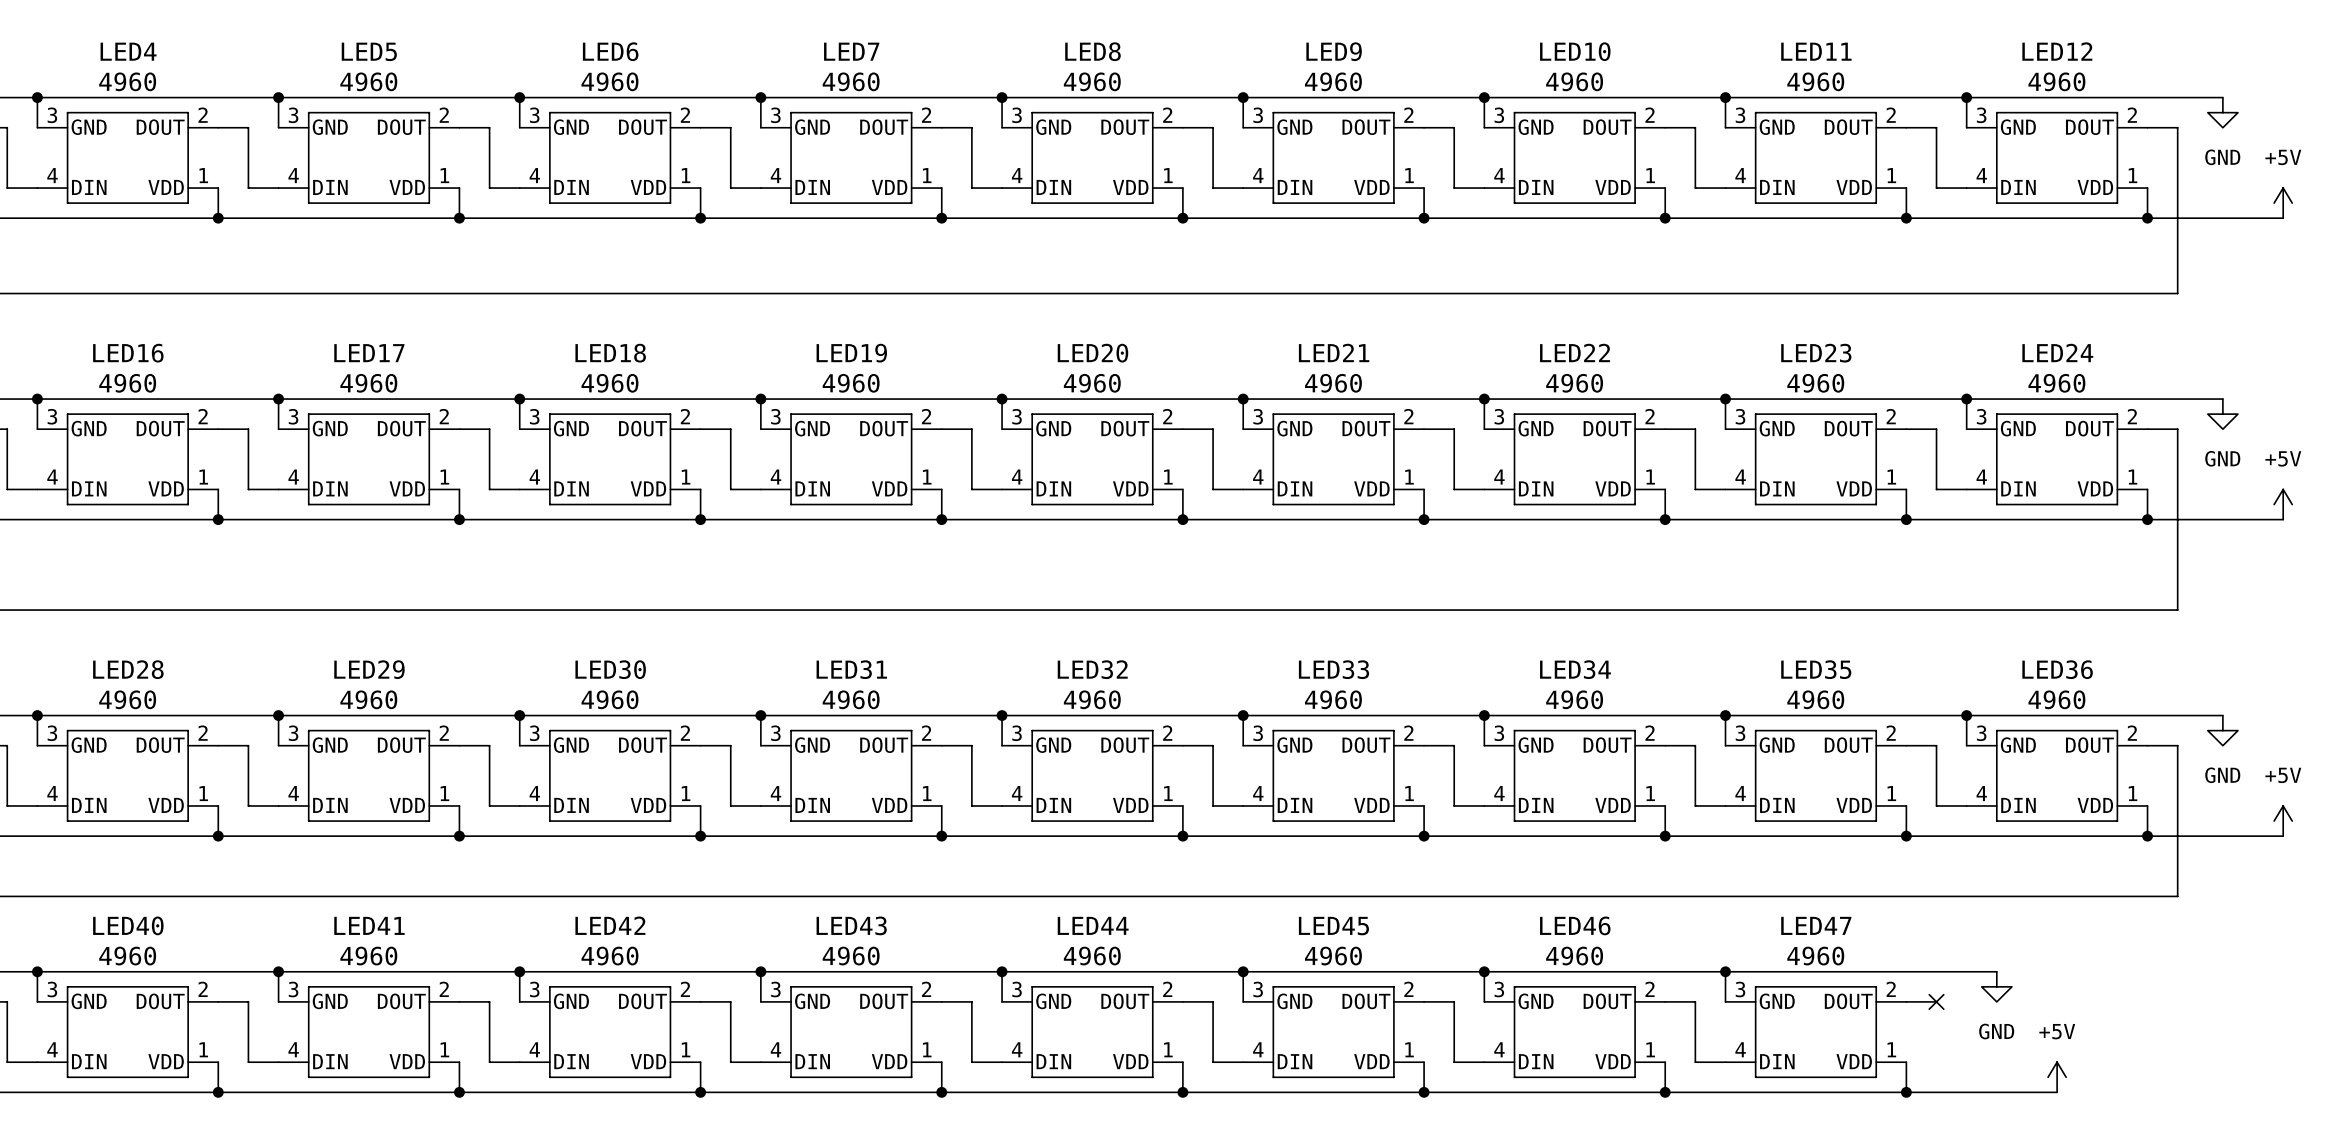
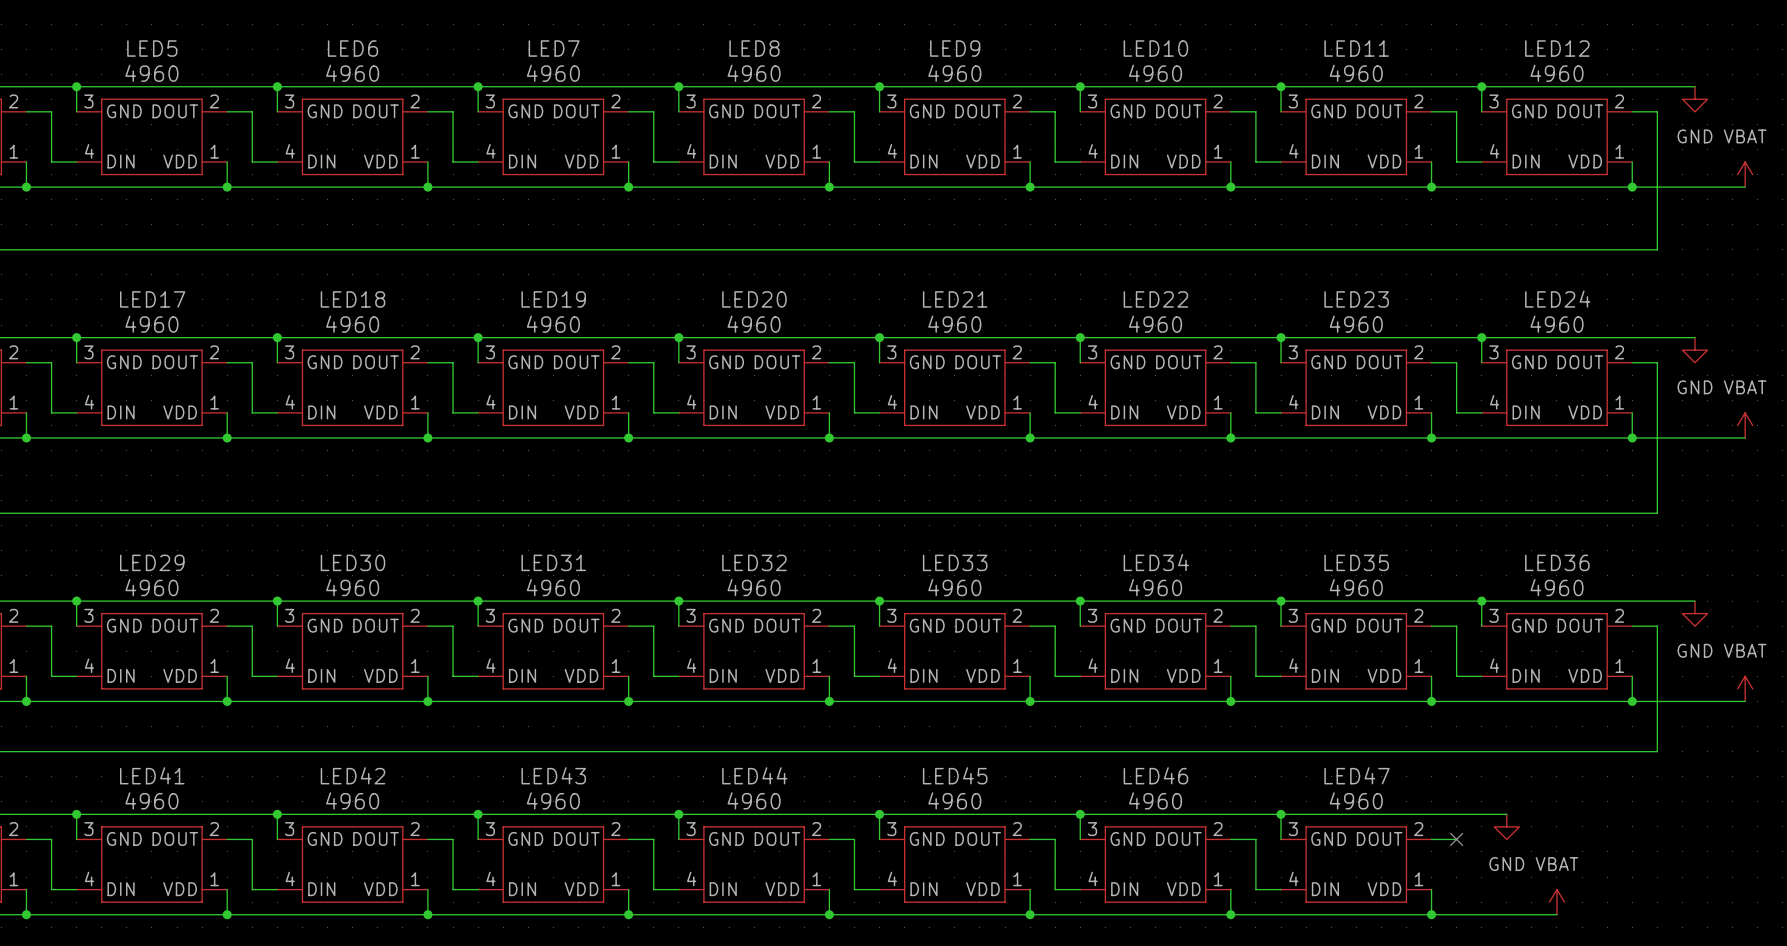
power symbol: +5V (2283, 203) -> VBAT (1745, 174)
power symbol: +5V (2283, 504) -> VBAT (1745, 425)
power symbol: +5V (2283, 821) -> VBAT (1745, 688)
power symbol: +5V (2057, 1077) -> VBAT (1556, 902)

